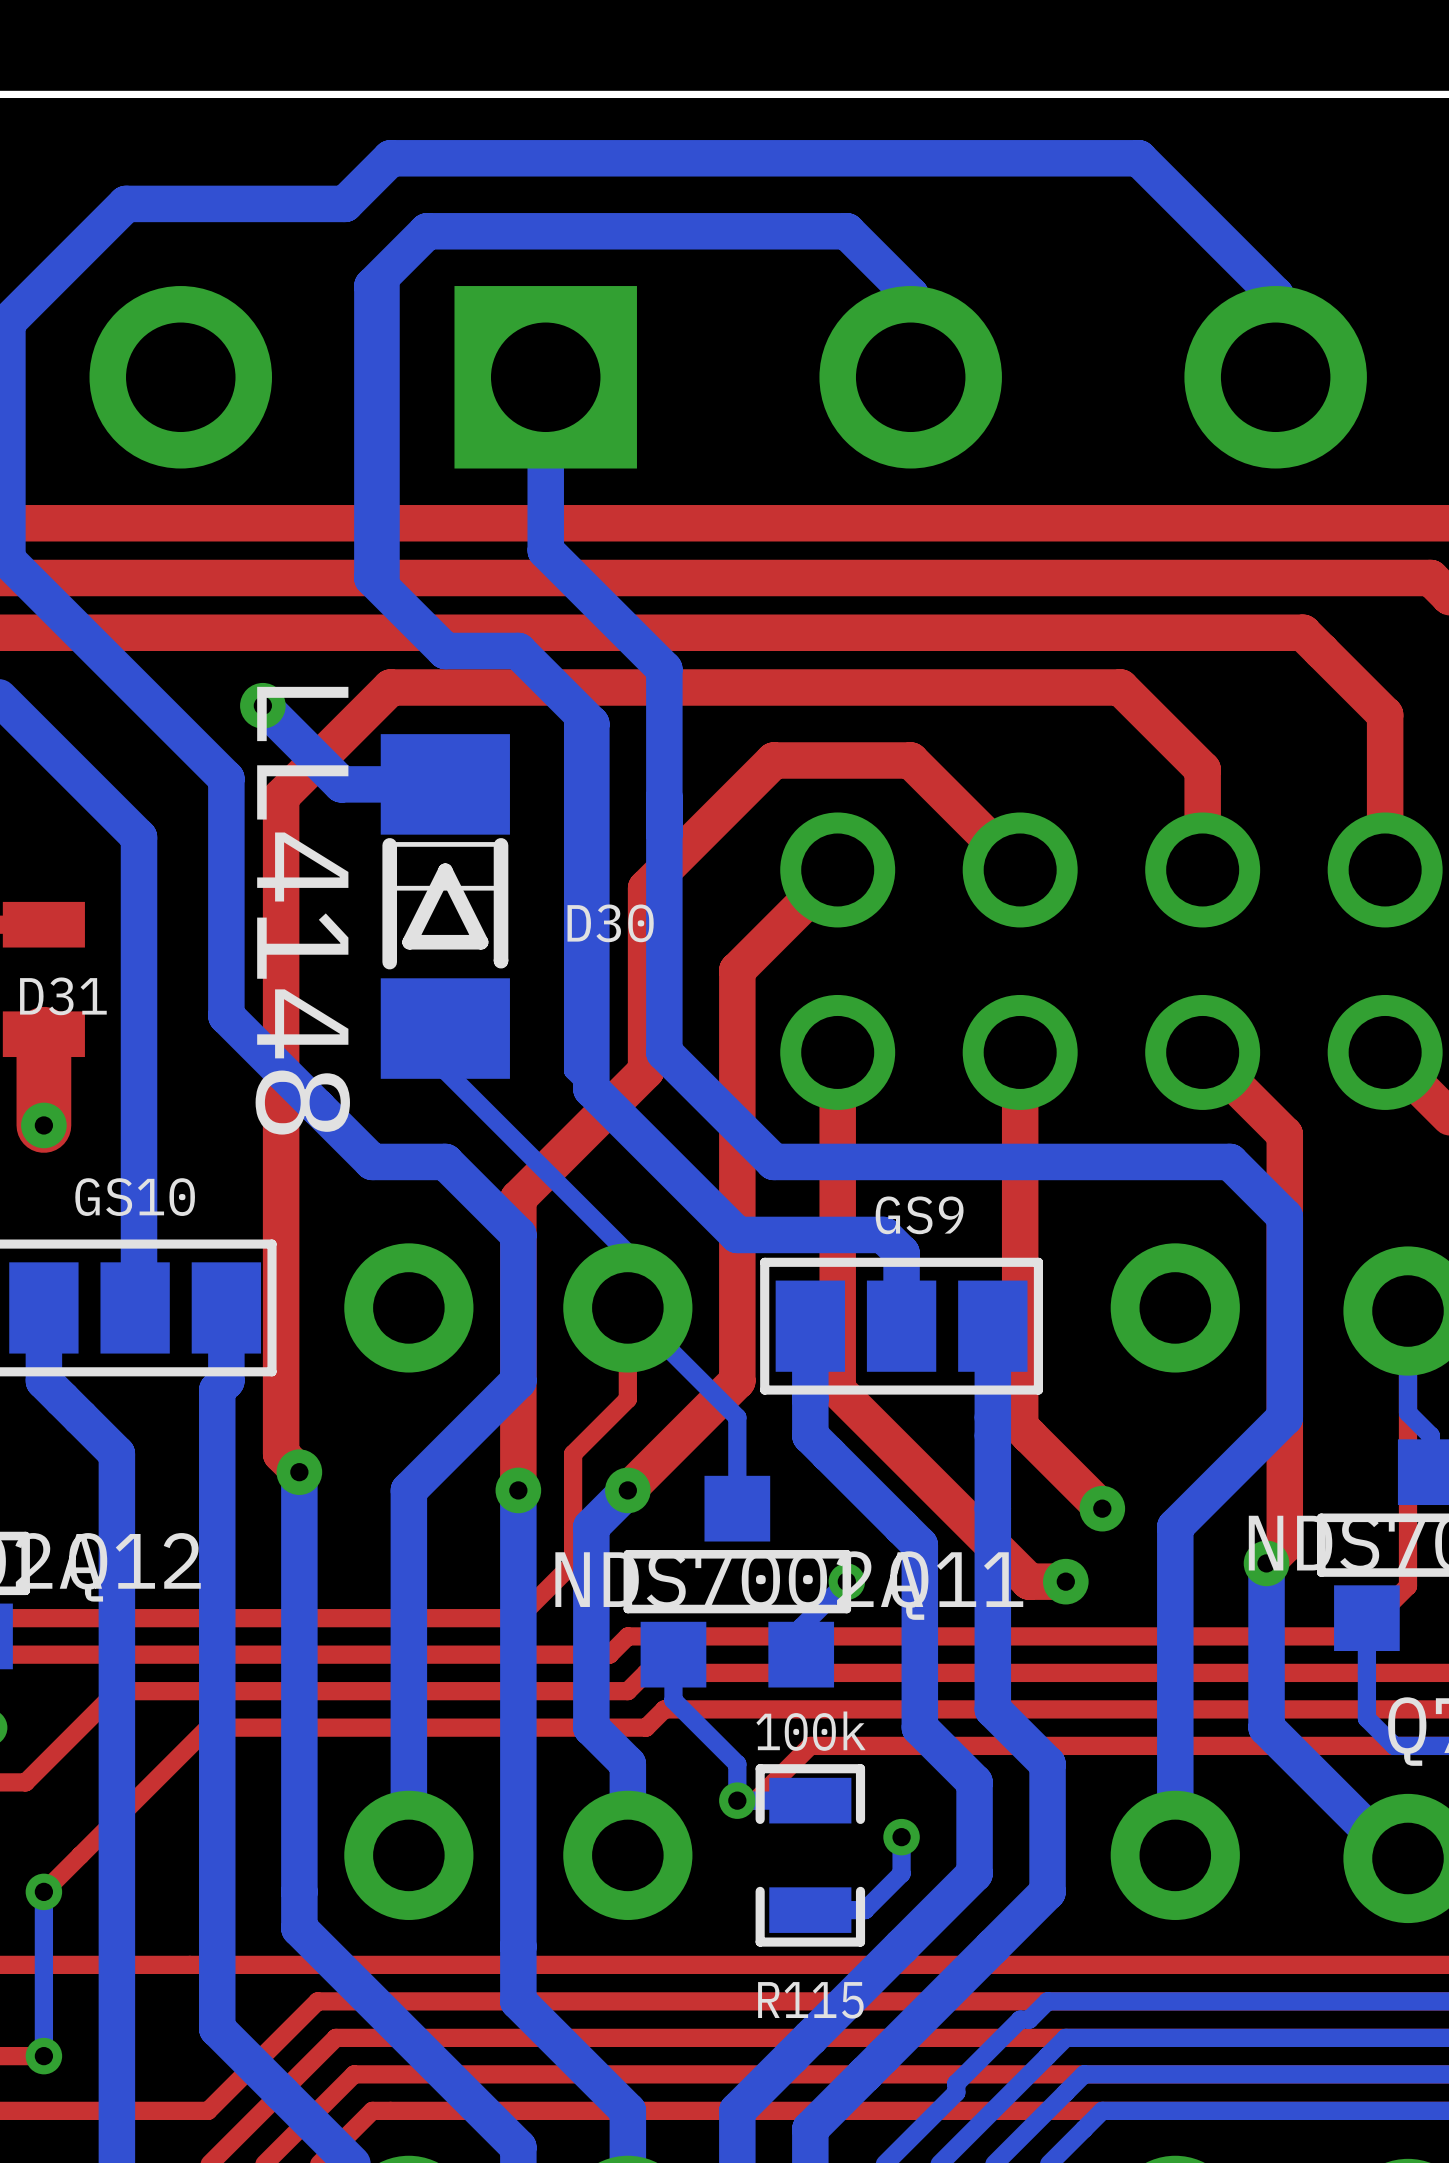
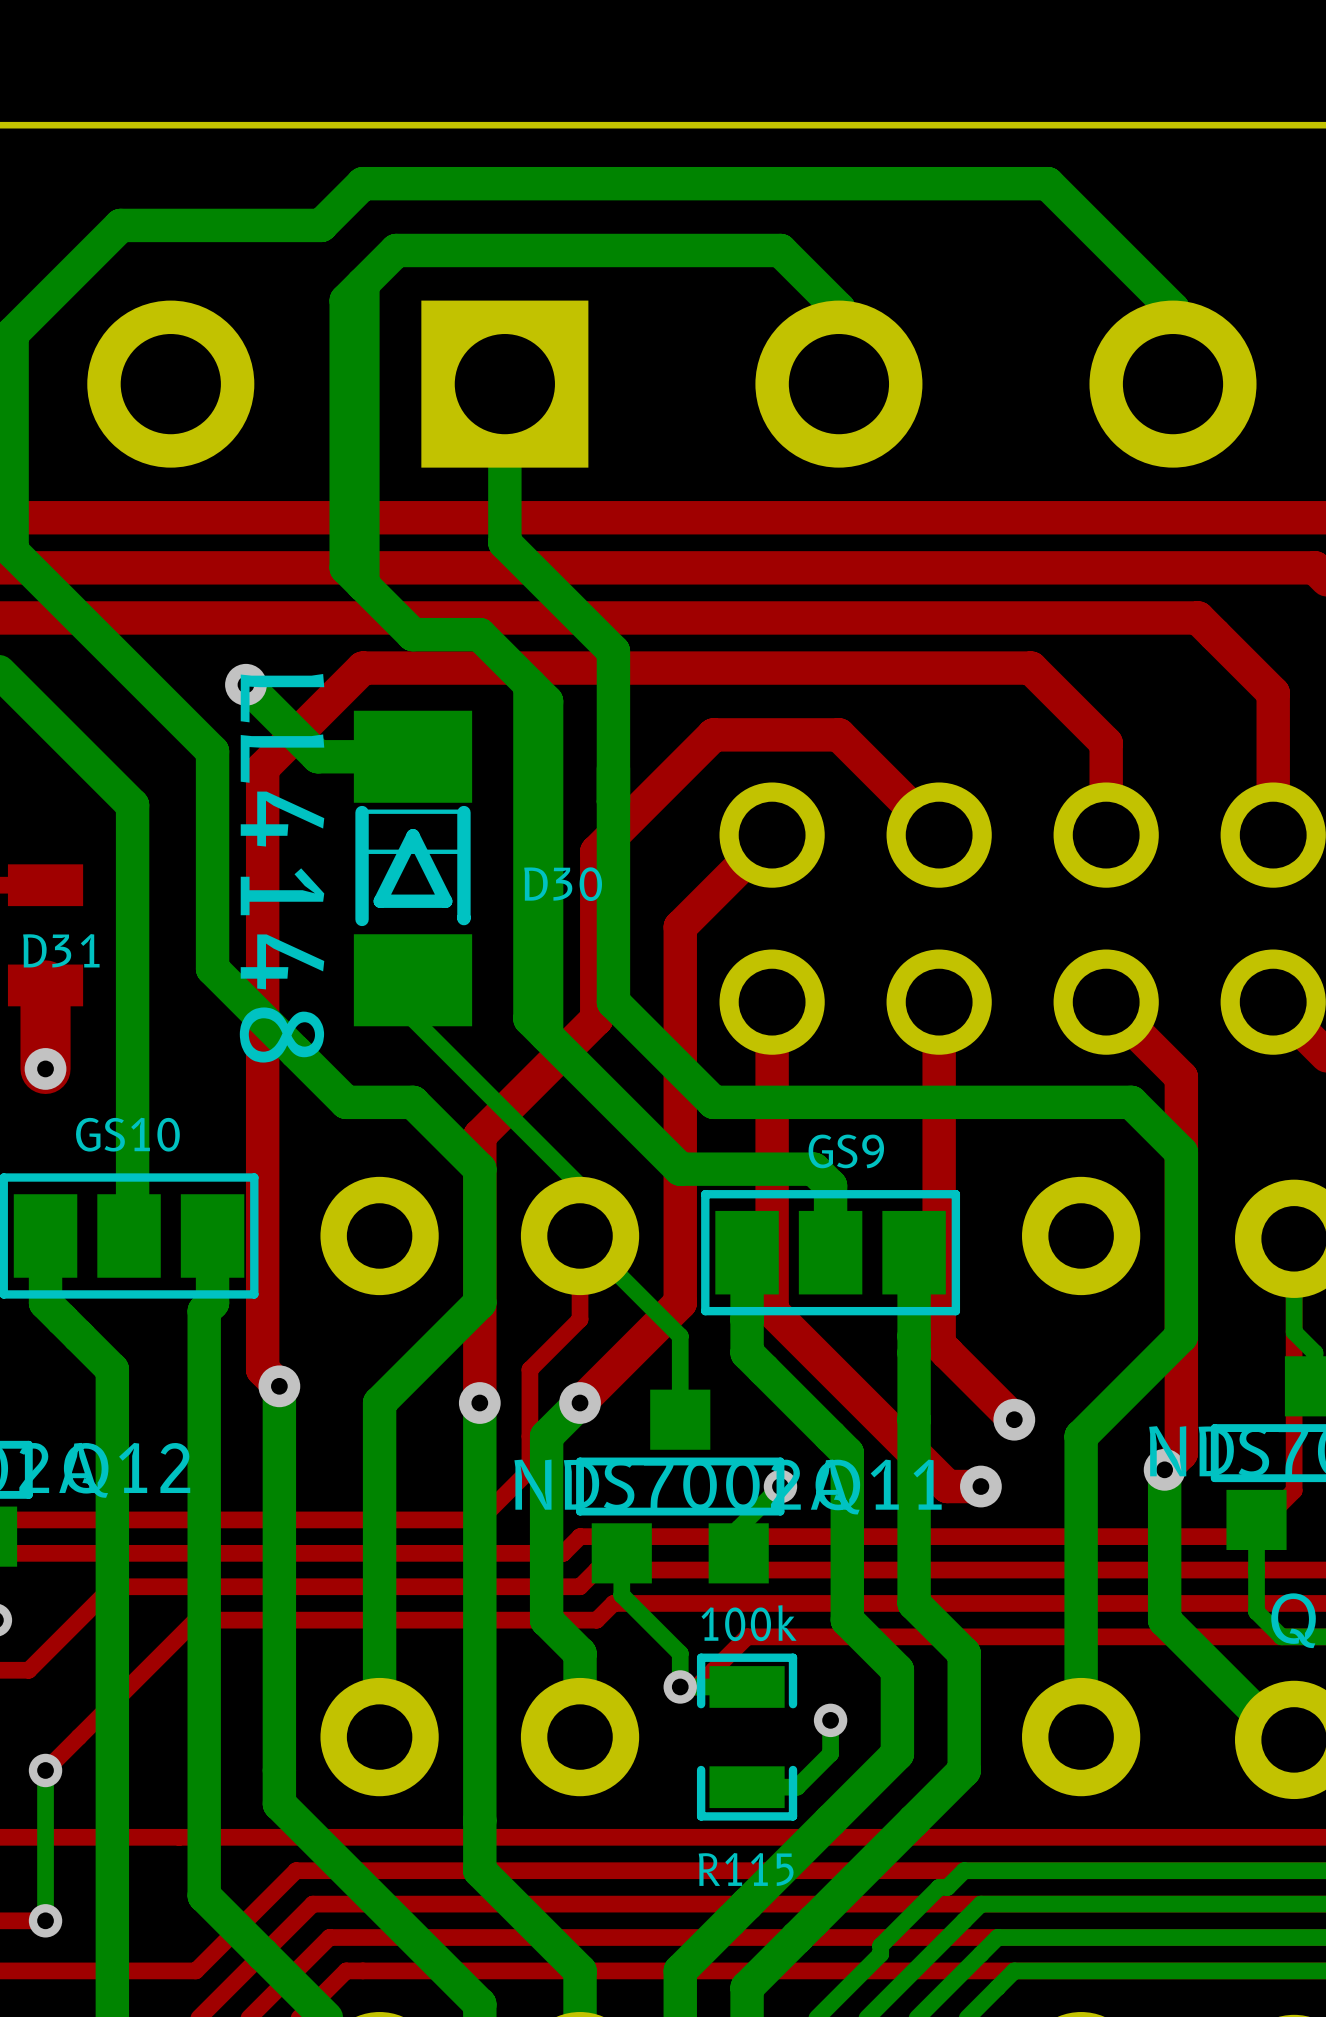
bottom track width: thin (390, 267) (390, 596) -> thick (362, 283) (362, 584)
bottom track width: thin (573, 705) (573, 1070) (591, 1088) -> thick (529, 684) (529, 1018) (546, 1035)

